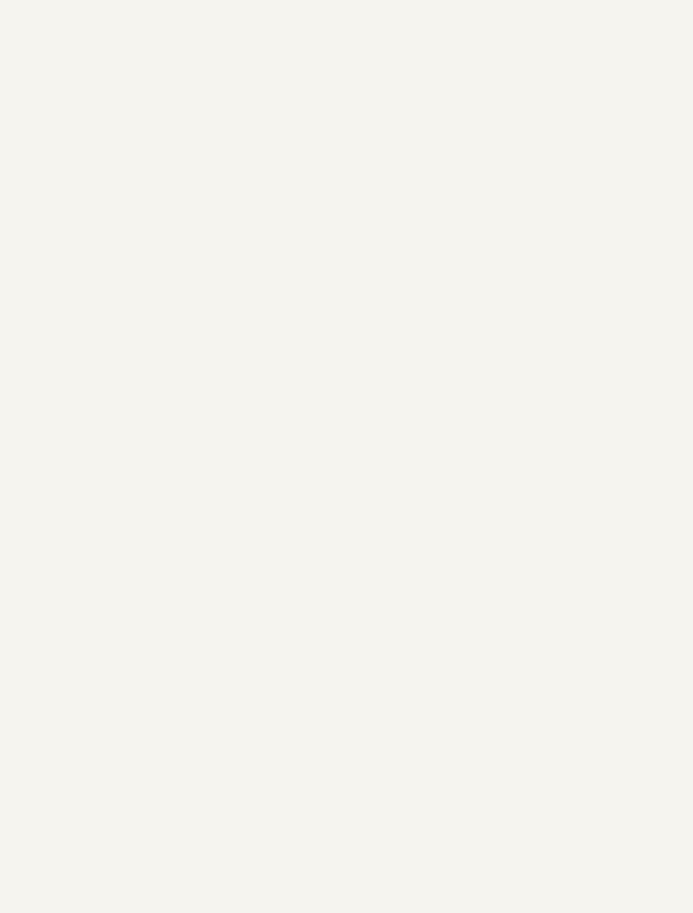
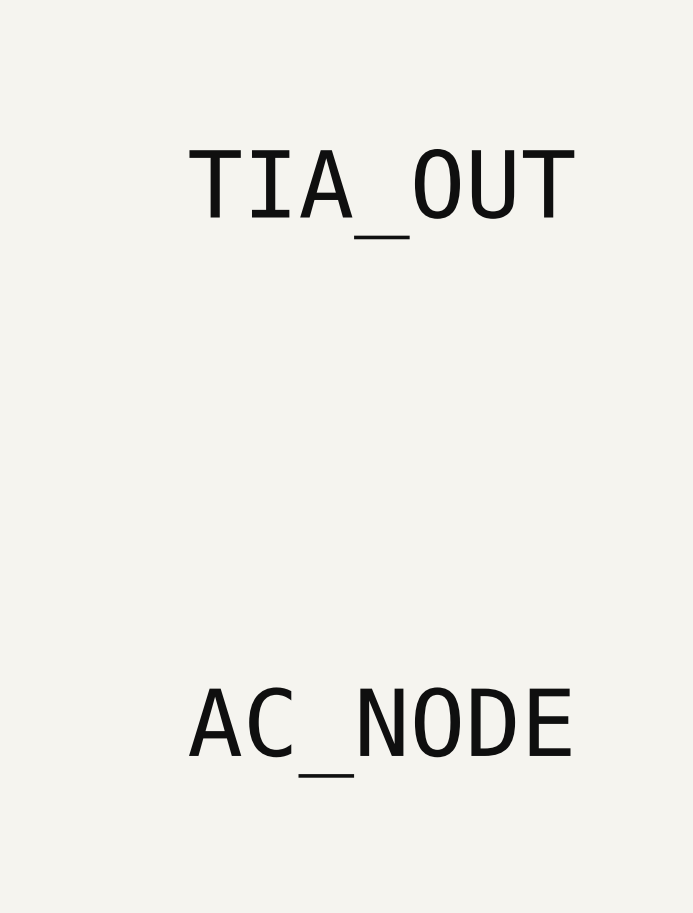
label: none -> TIA_OUT (381, 194)
label: none -> AC_NODE (379, 732)

